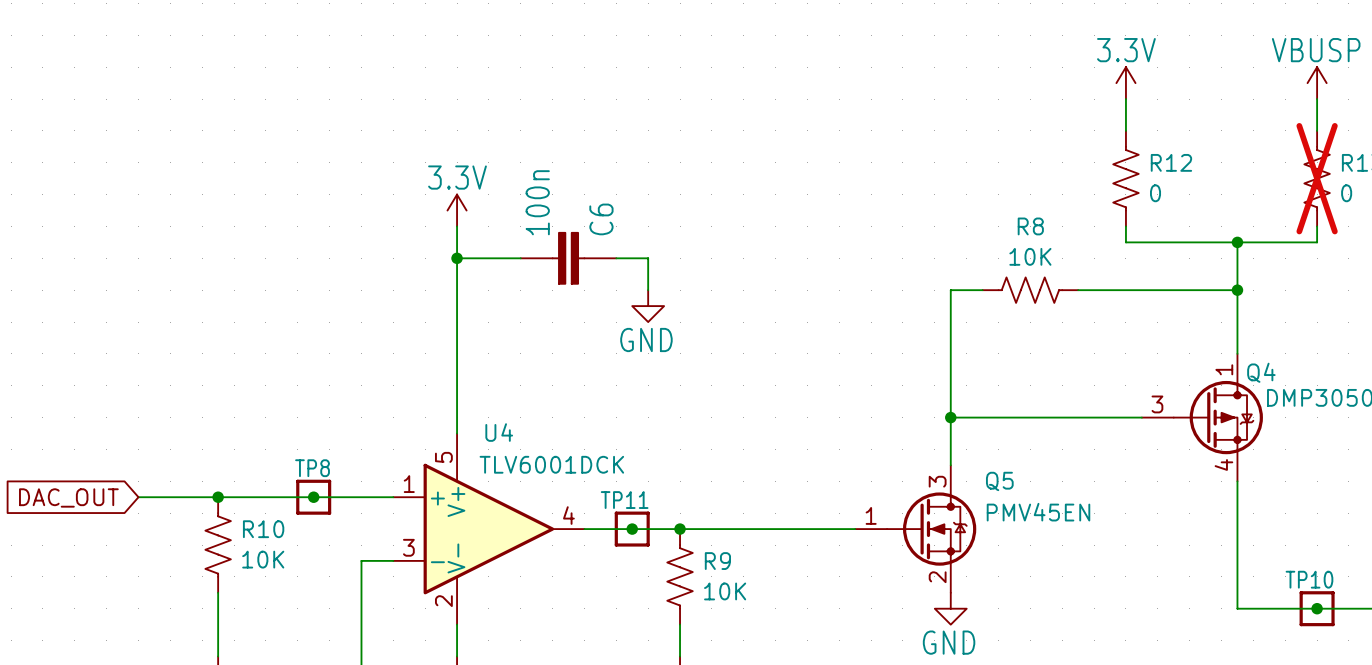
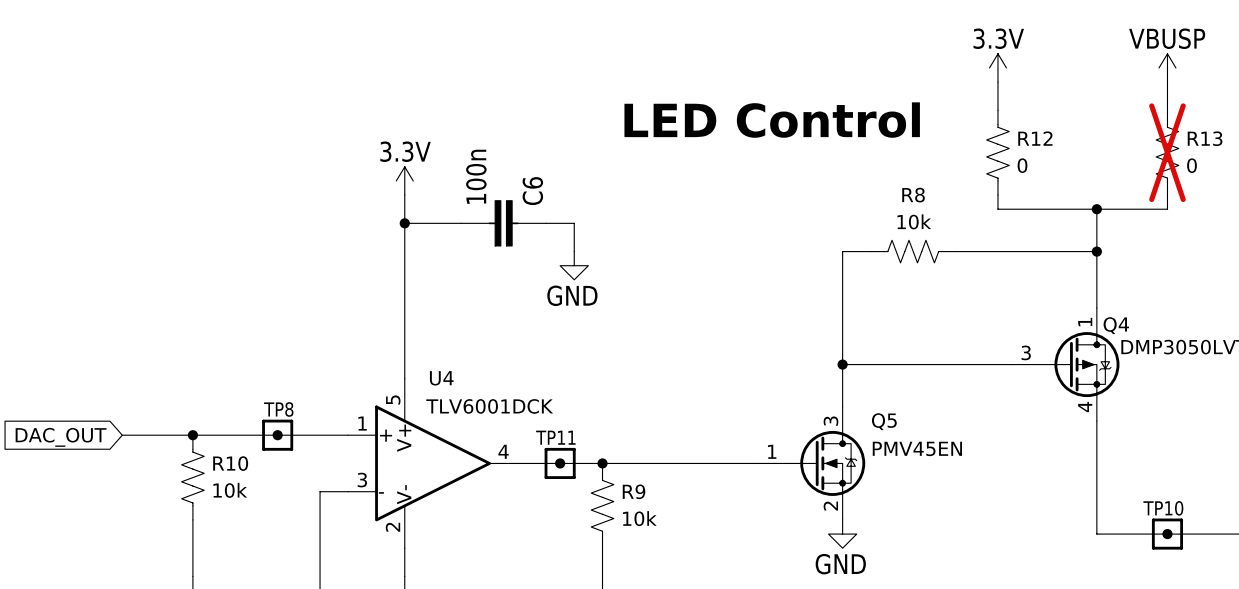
text: none -> LED Control (772, 120)
R8 value: 10K (1030, 256) -> 10k (914, 221)
R10 value: 10K (263, 559) -> 10k (230, 490)
R9 value: 10K (725, 591) -> 10k (639, 518)

